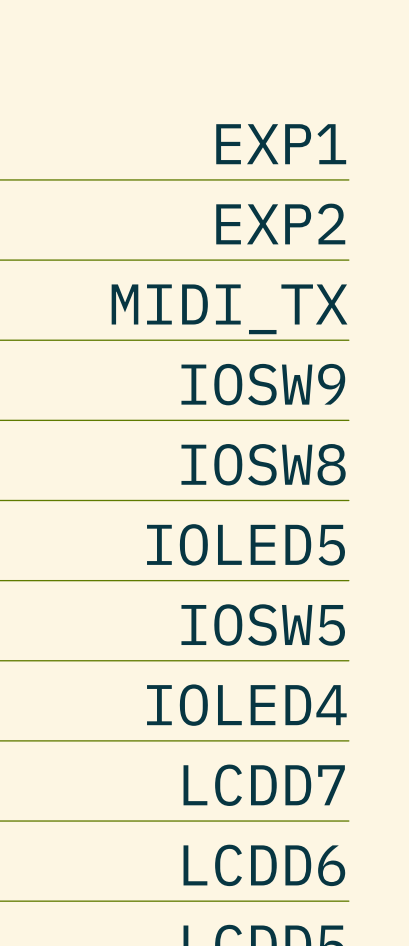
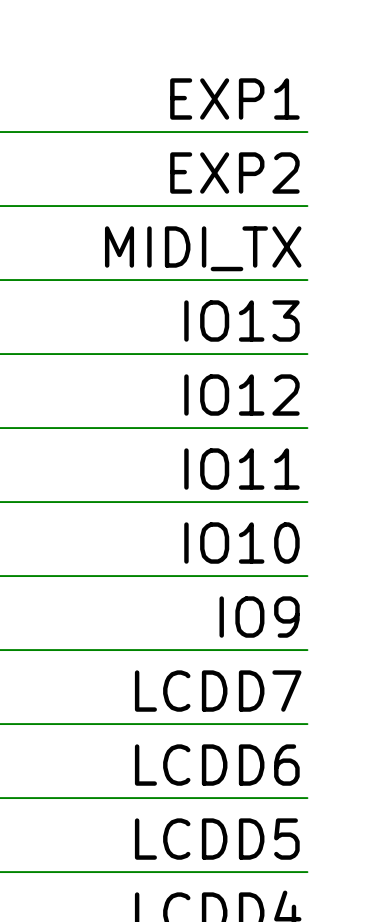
label: IOSW9 (263, 384) -> IO13 (241, 321)
label: IOSW8 (263, 464) -> IO12 (241, 395)
label: IOLED5 (246, 544) -> IO11 (241, 469)
label: IOSW5 (263, 625) -> IO10 (241, 543)
label: IOLED4 (246, 705) -> IO9 (259, 617)

